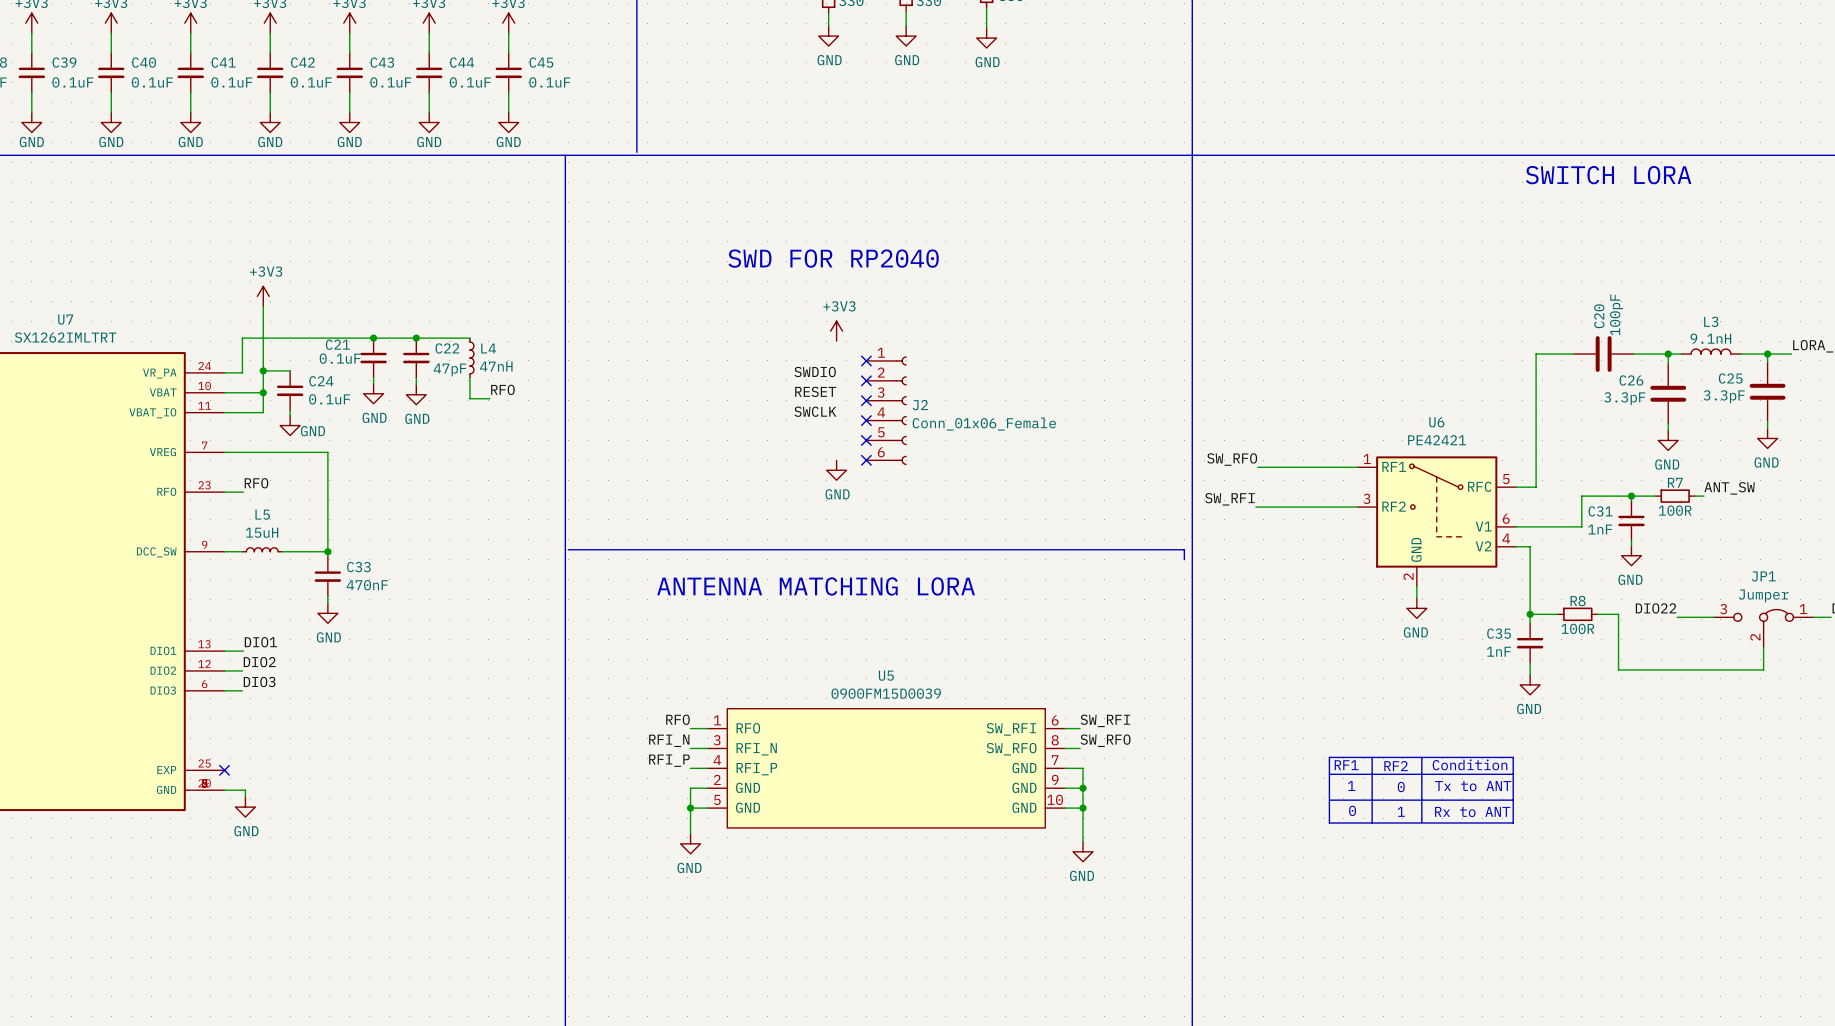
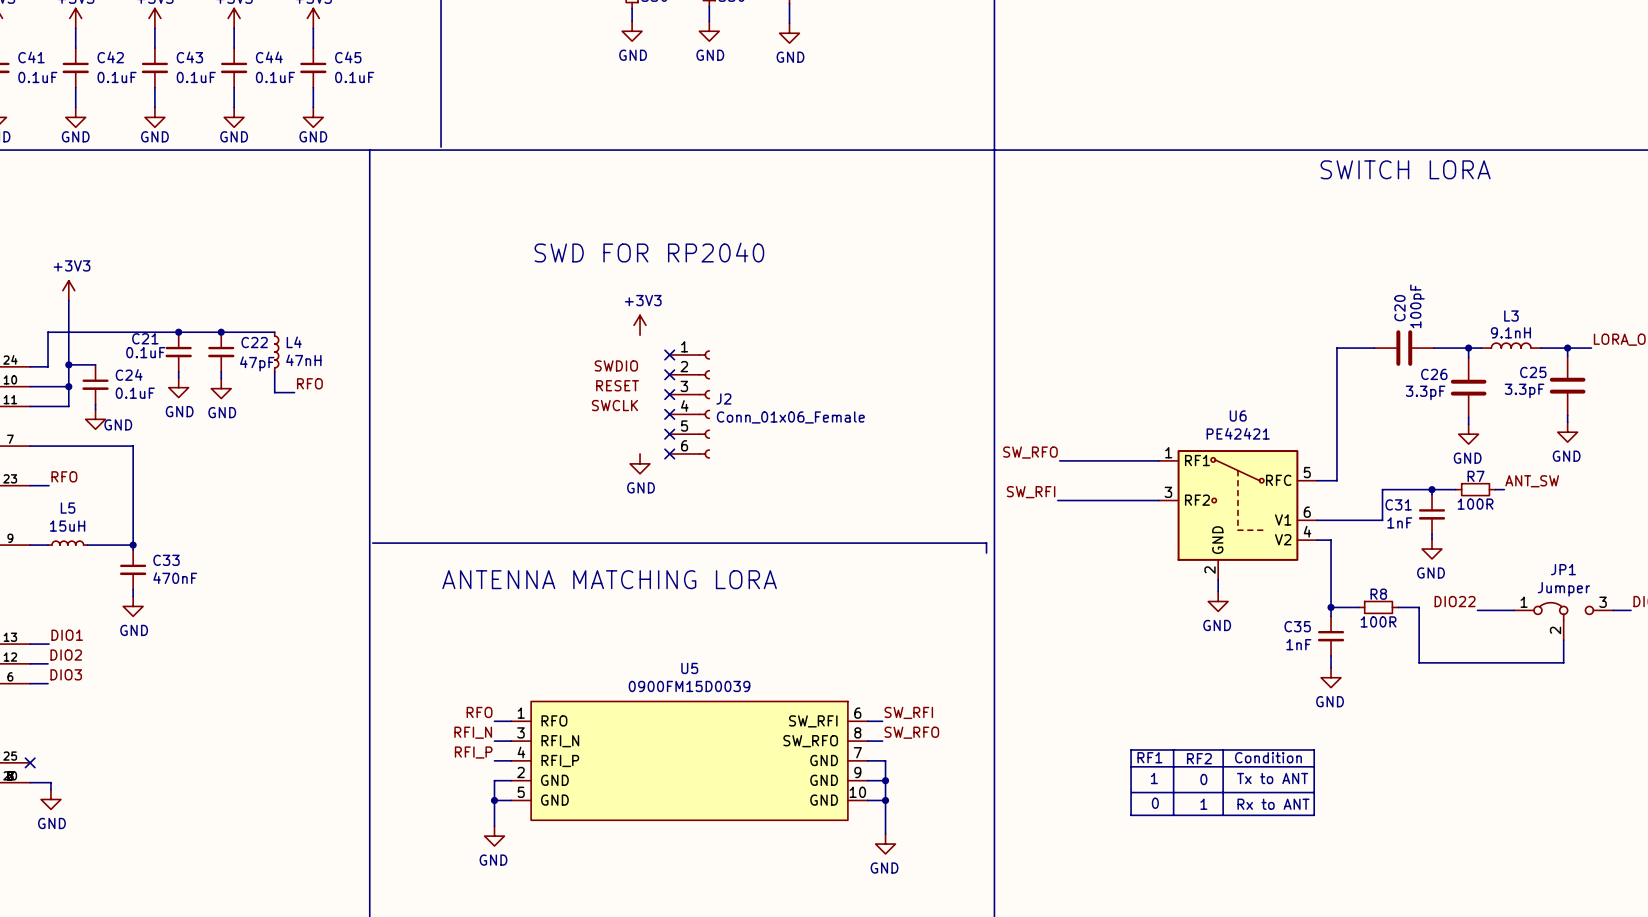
JP1 flip: as is (1763, 618) -> left-right (1563, 611)

